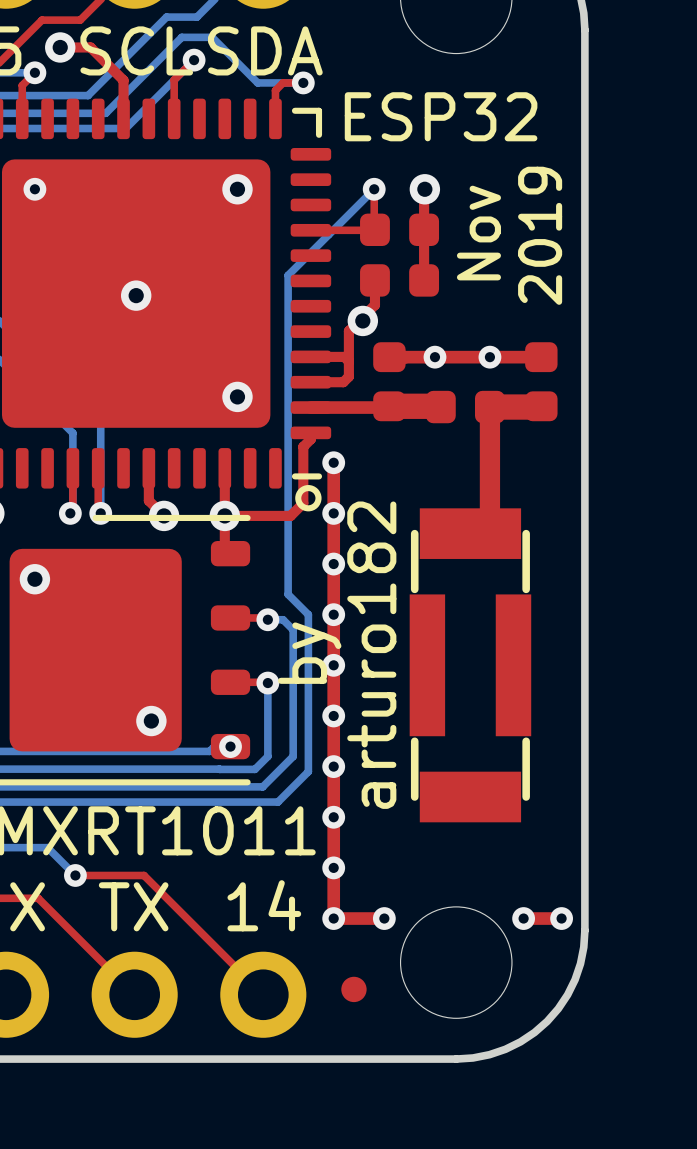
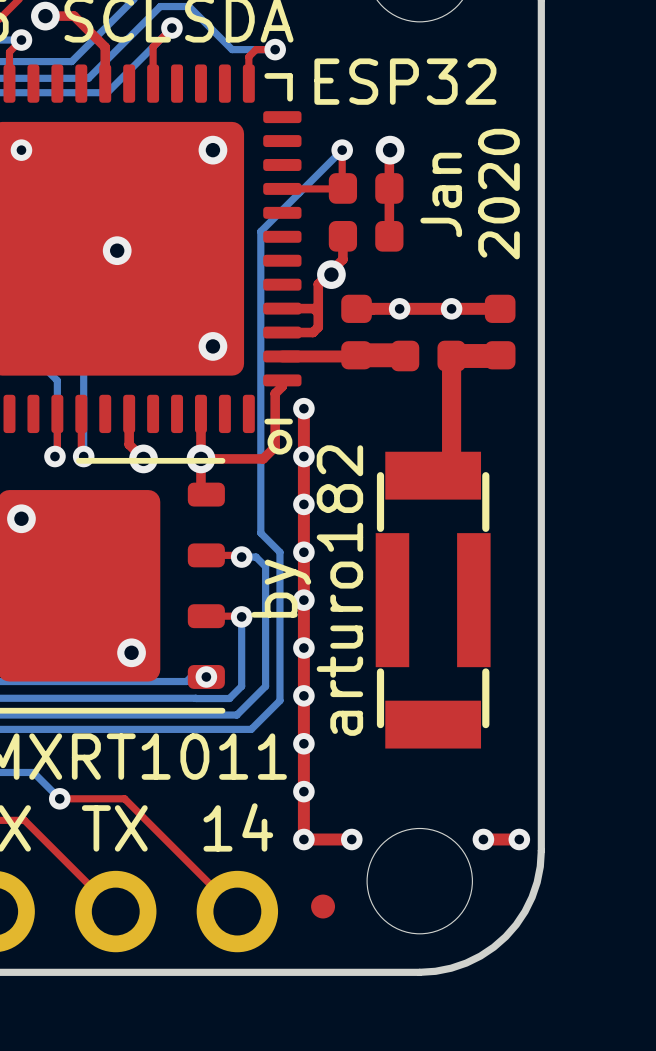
text: Nov (478, 233) -> Jan (441, 194)
text: 2019 (540, 235) -> 2020 (499, 194)

